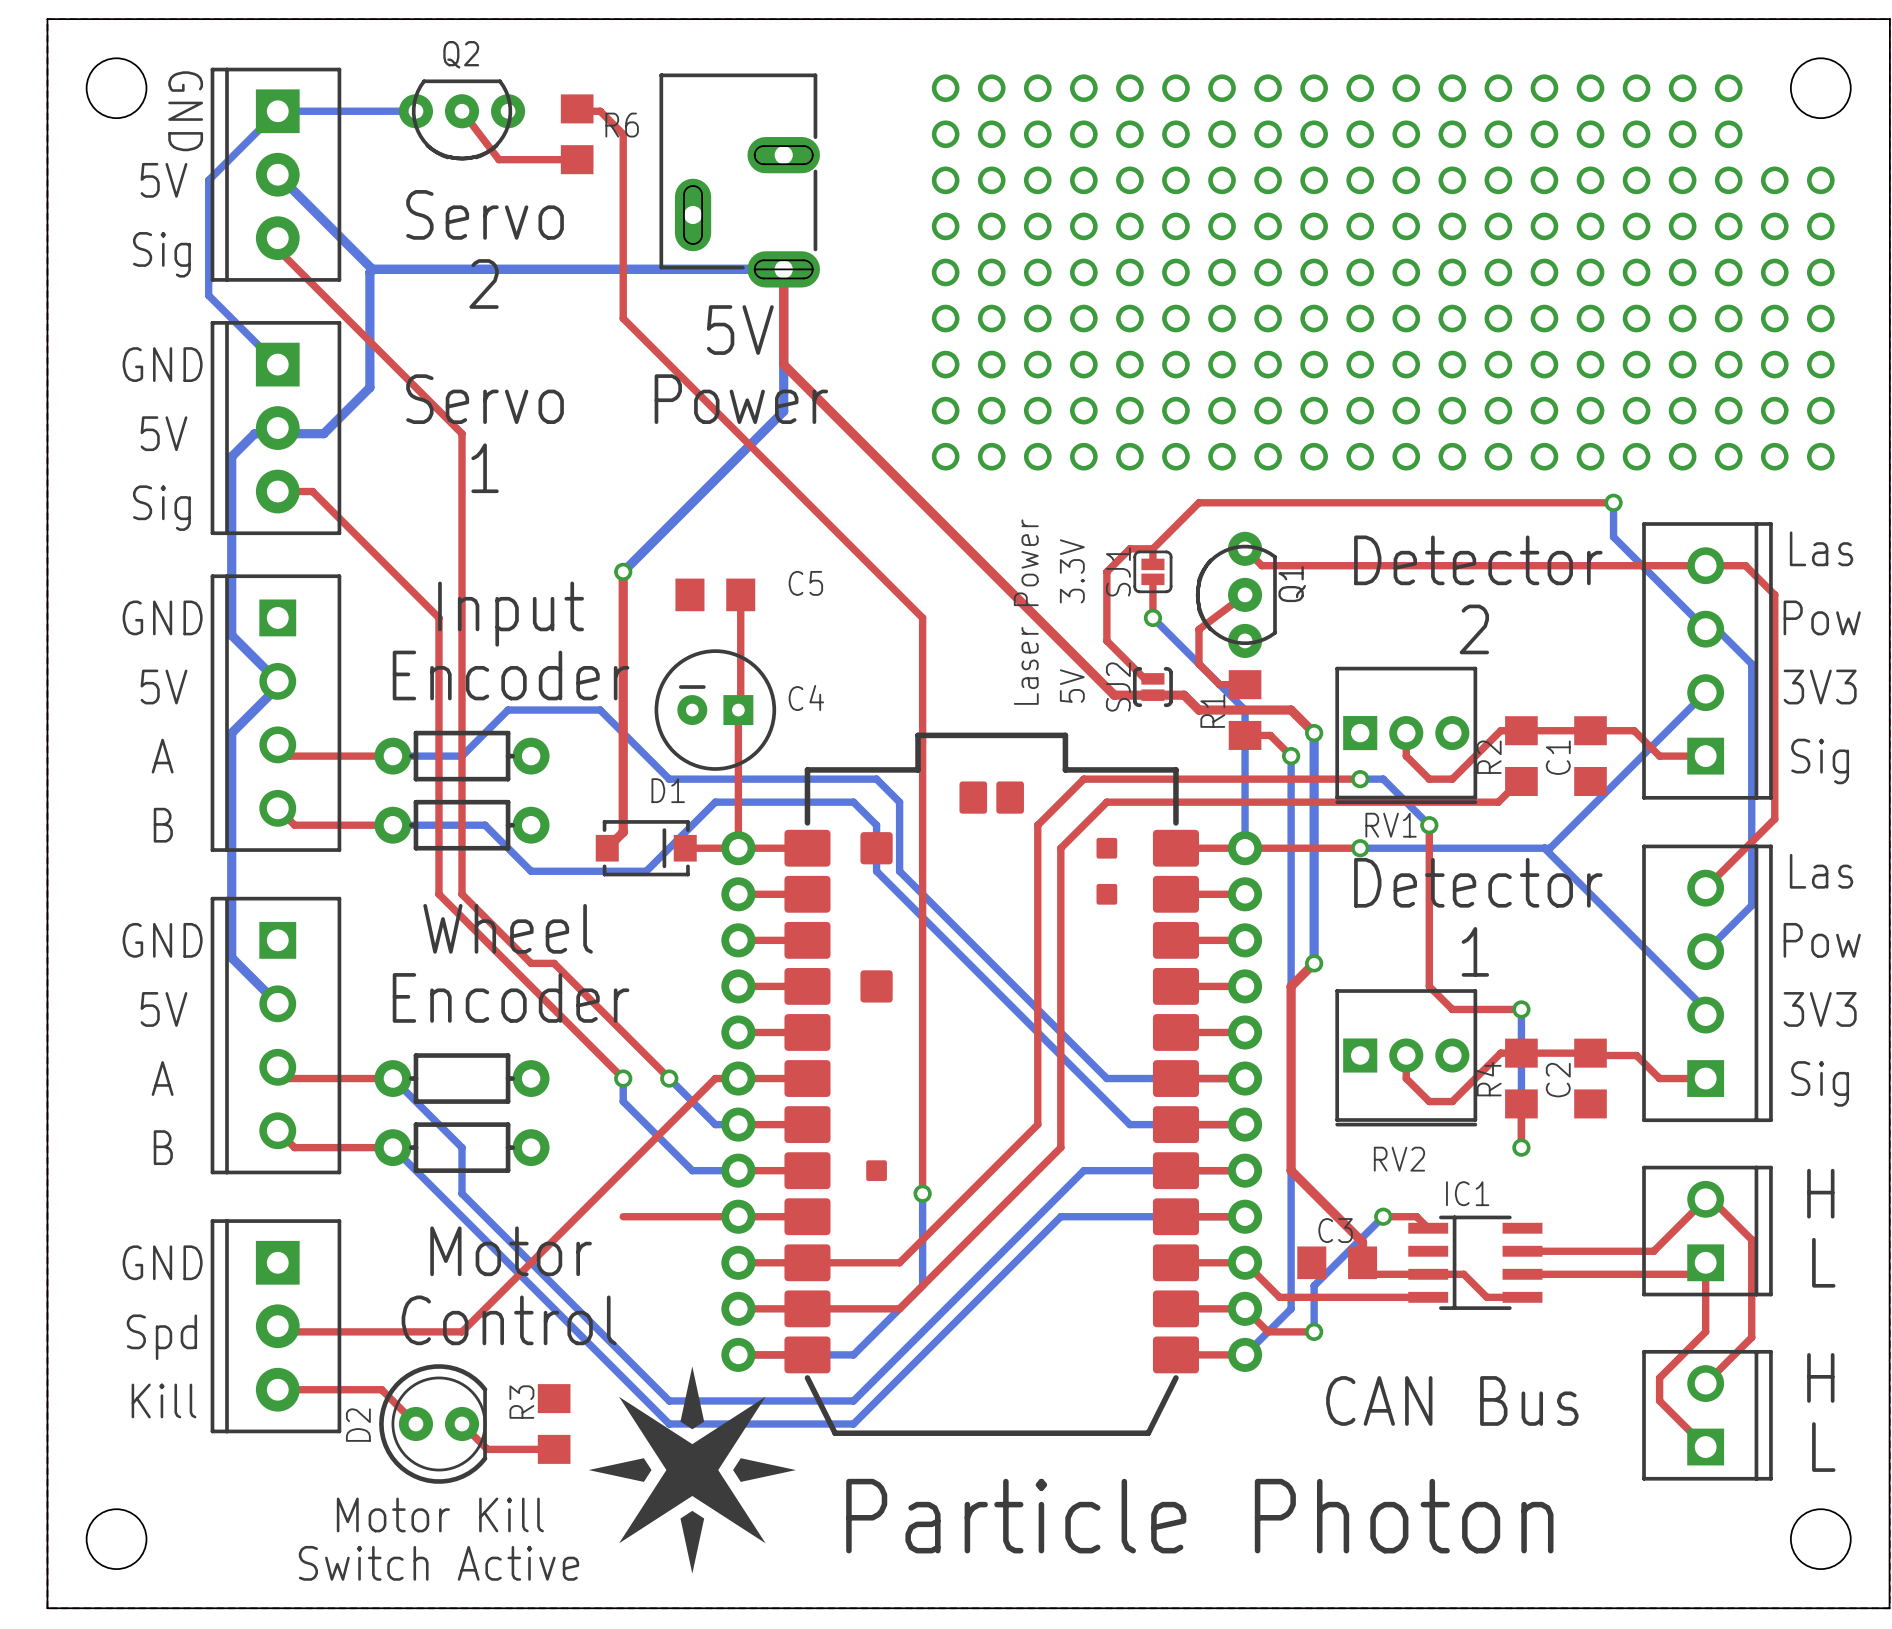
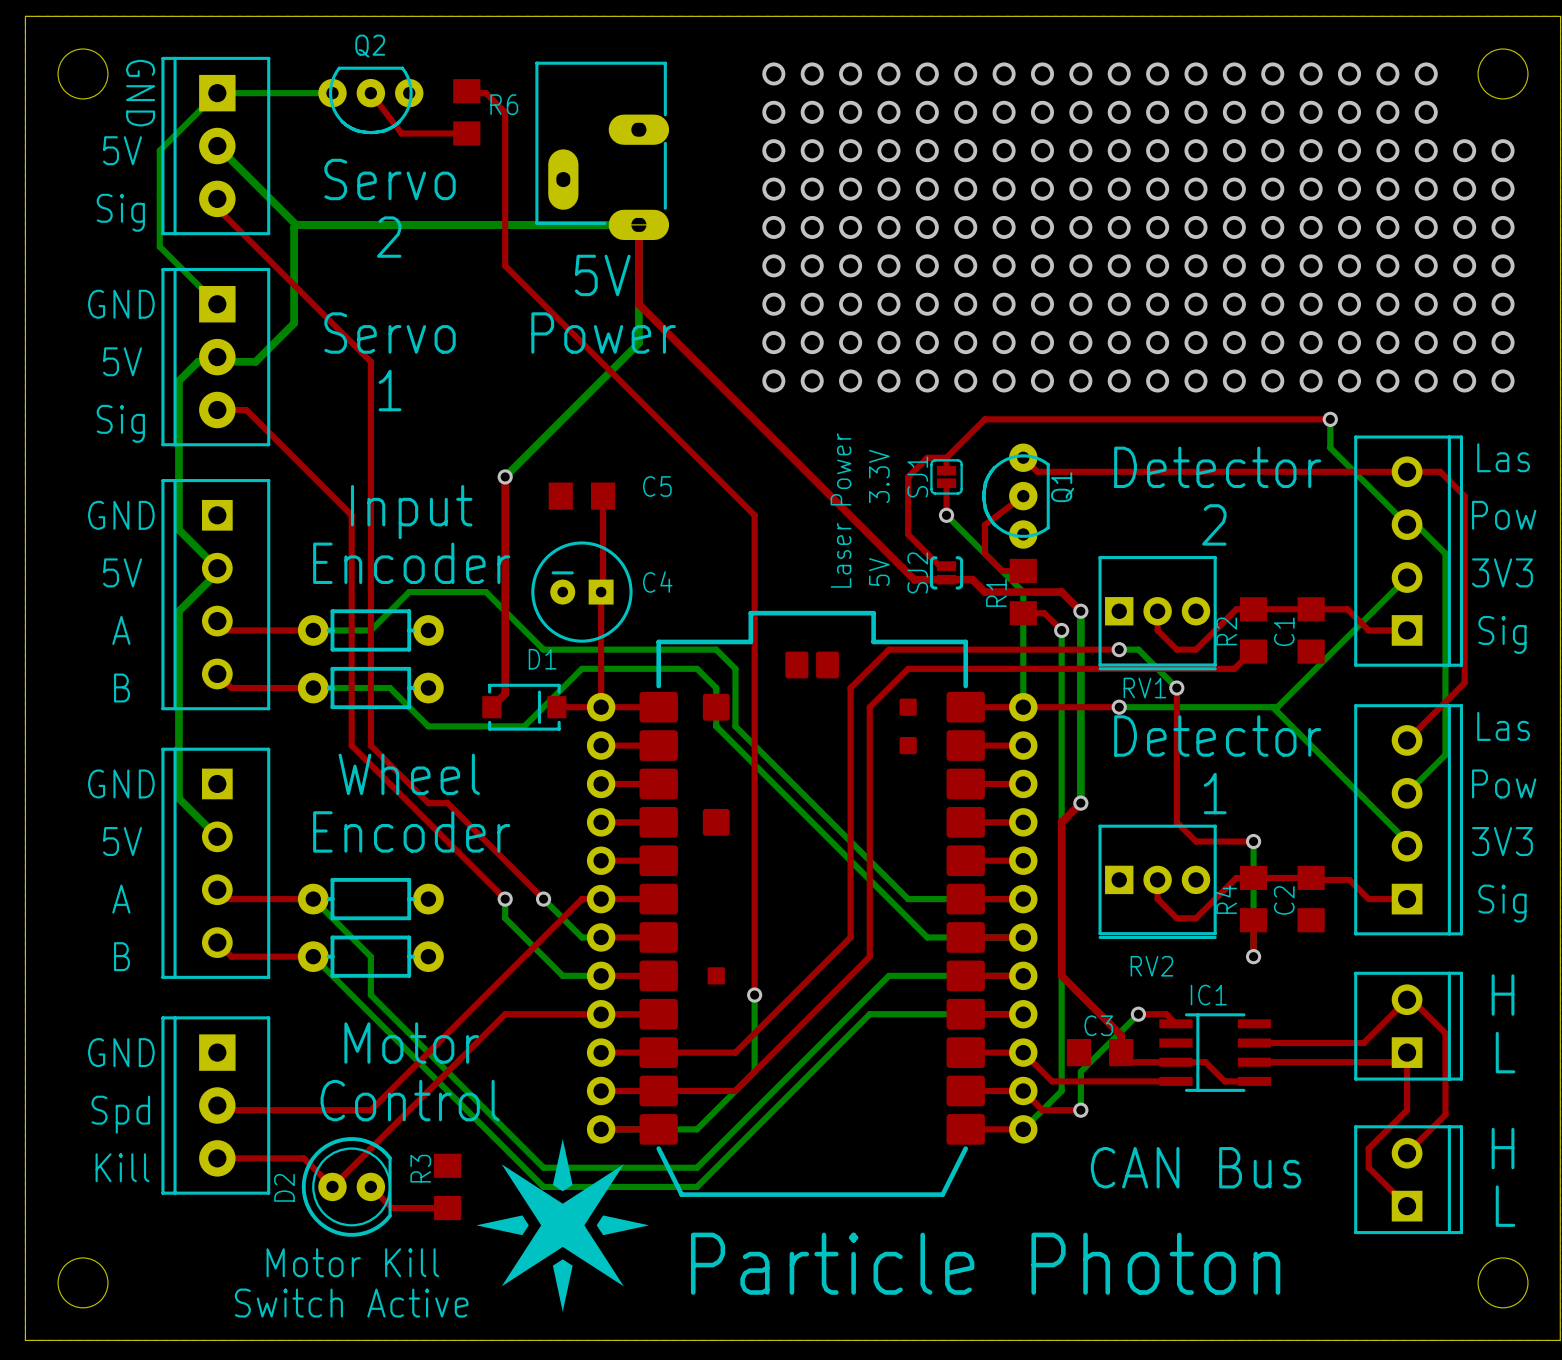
top track: none -> (505, 1014) (332, 1186)

